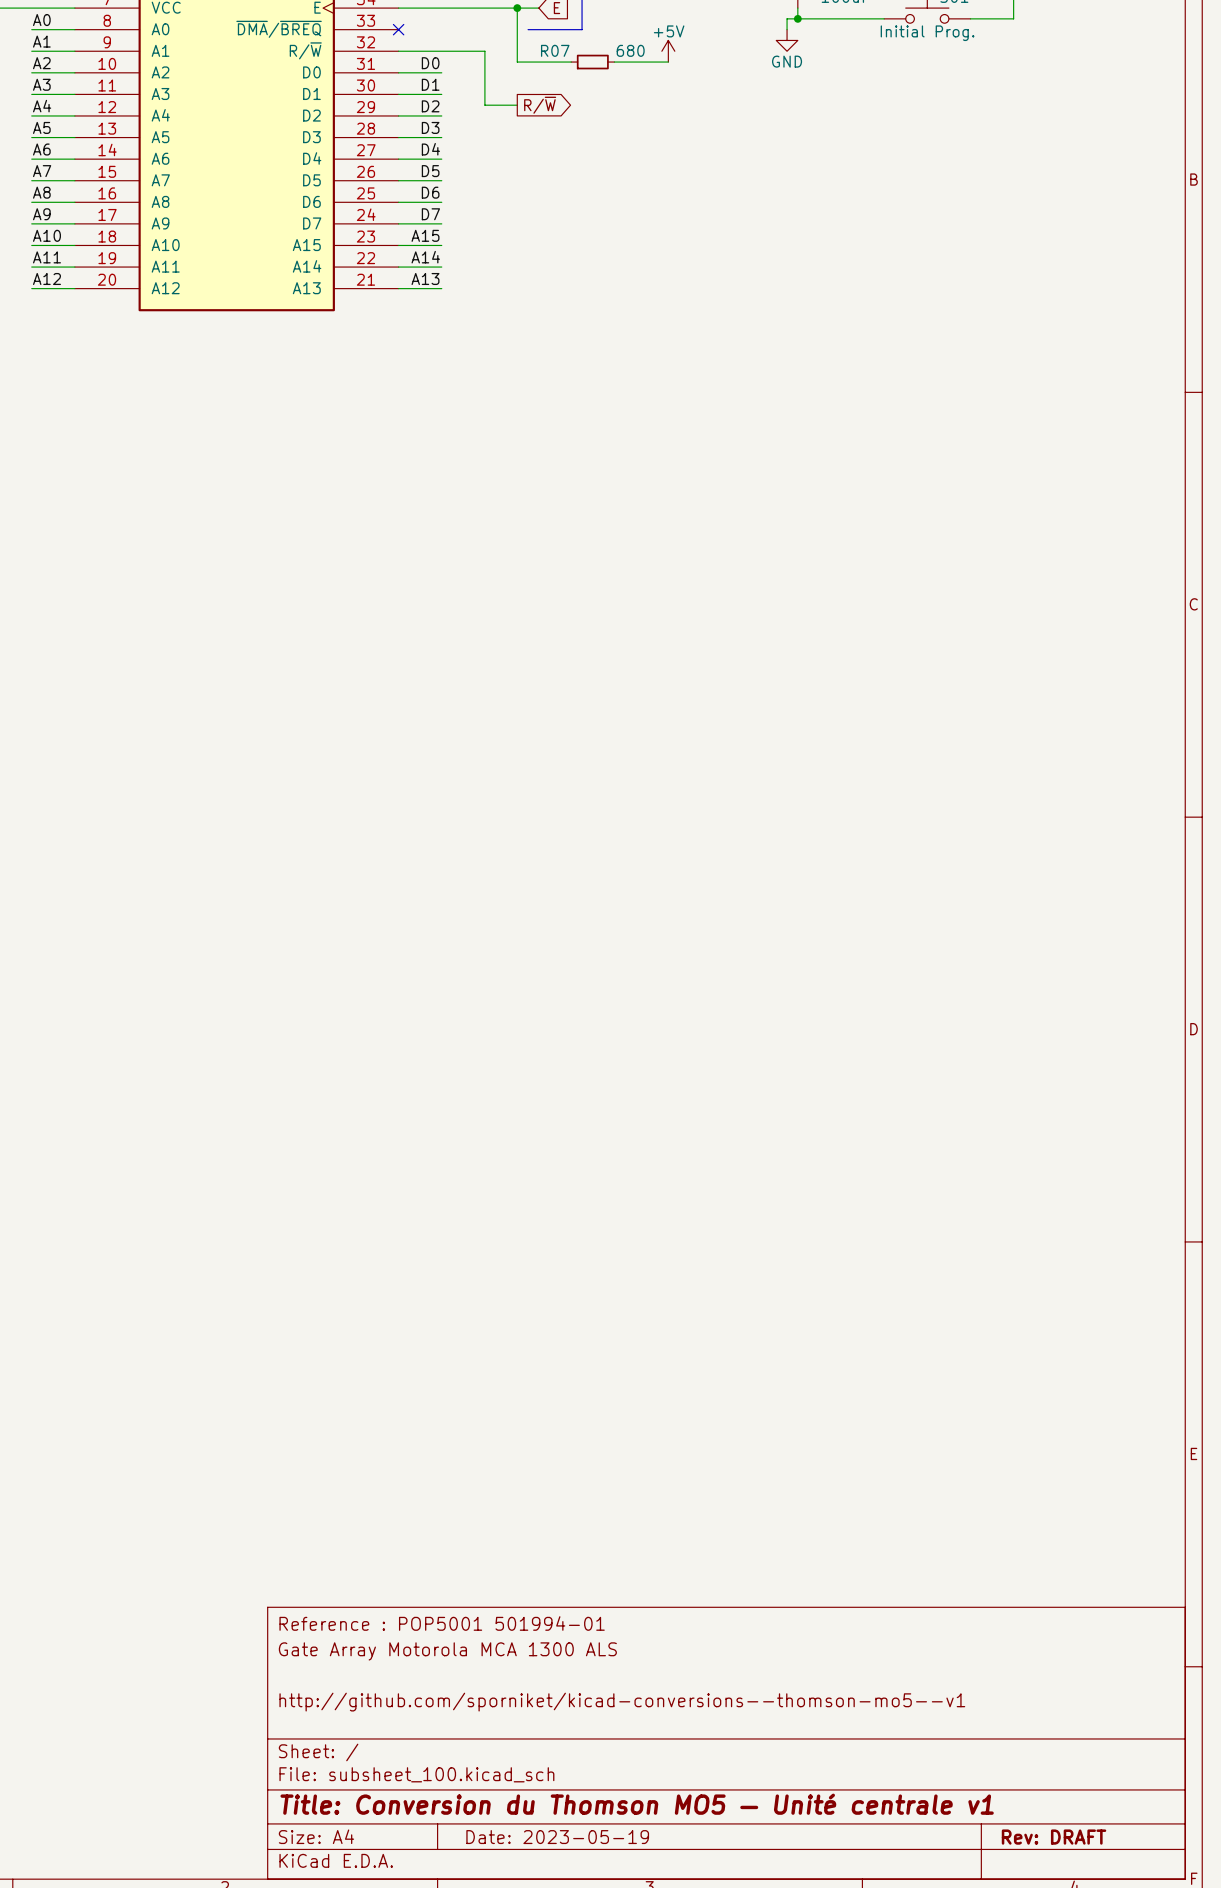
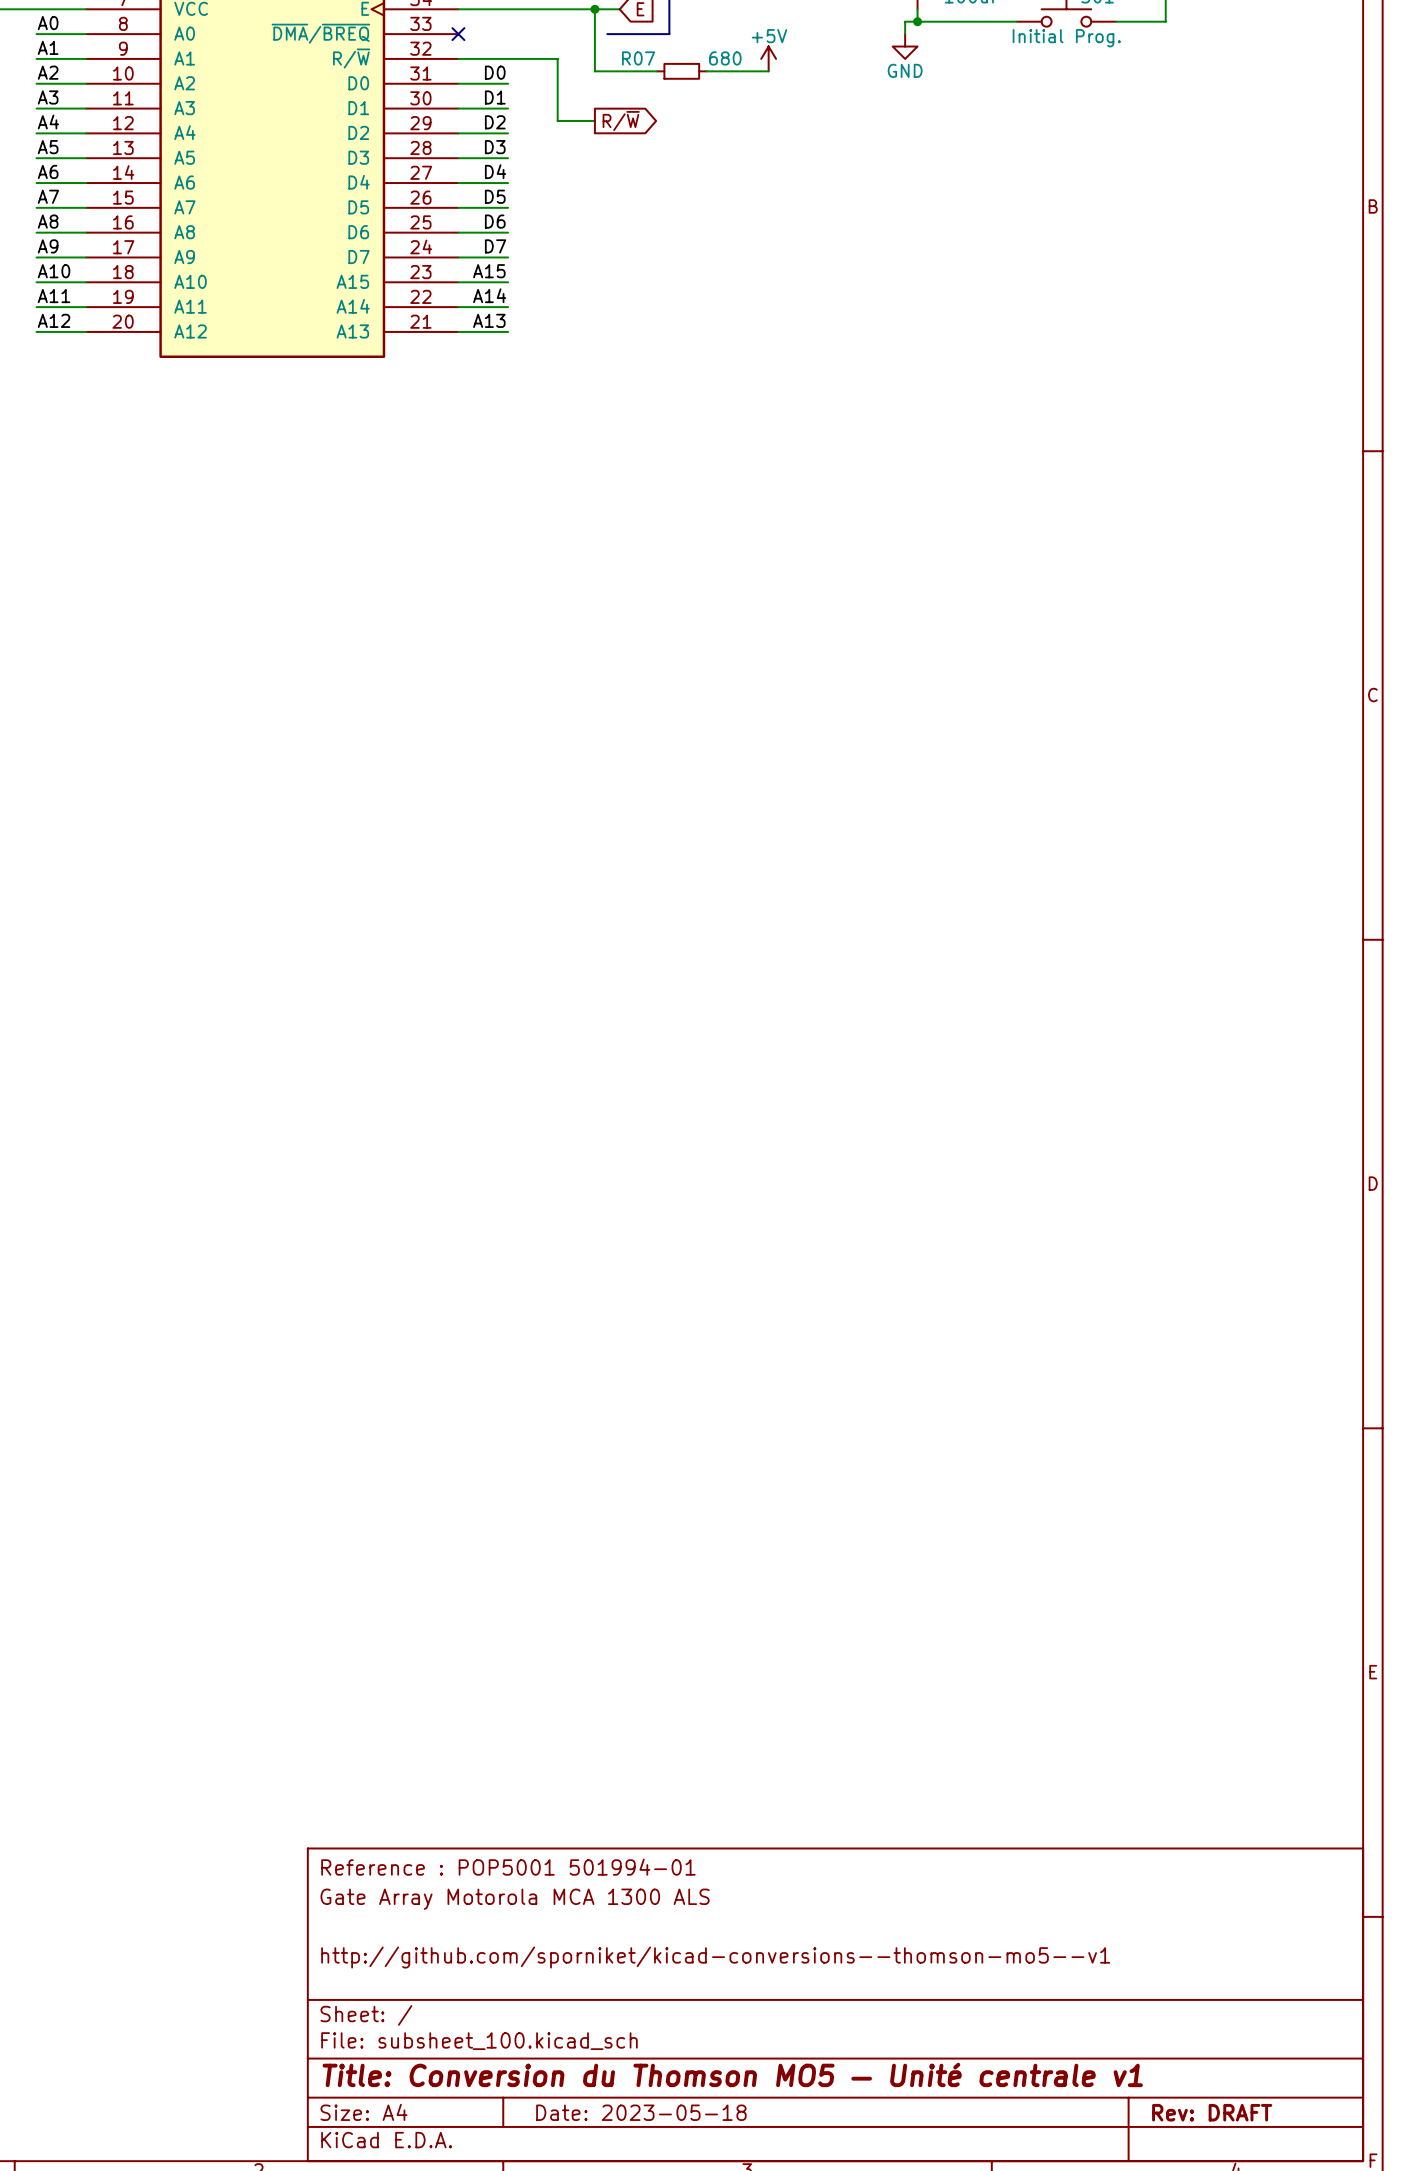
title block: Date: 2023-05-19 (557, 1837) -> Date: 2023-05-18 (641, 2112)

